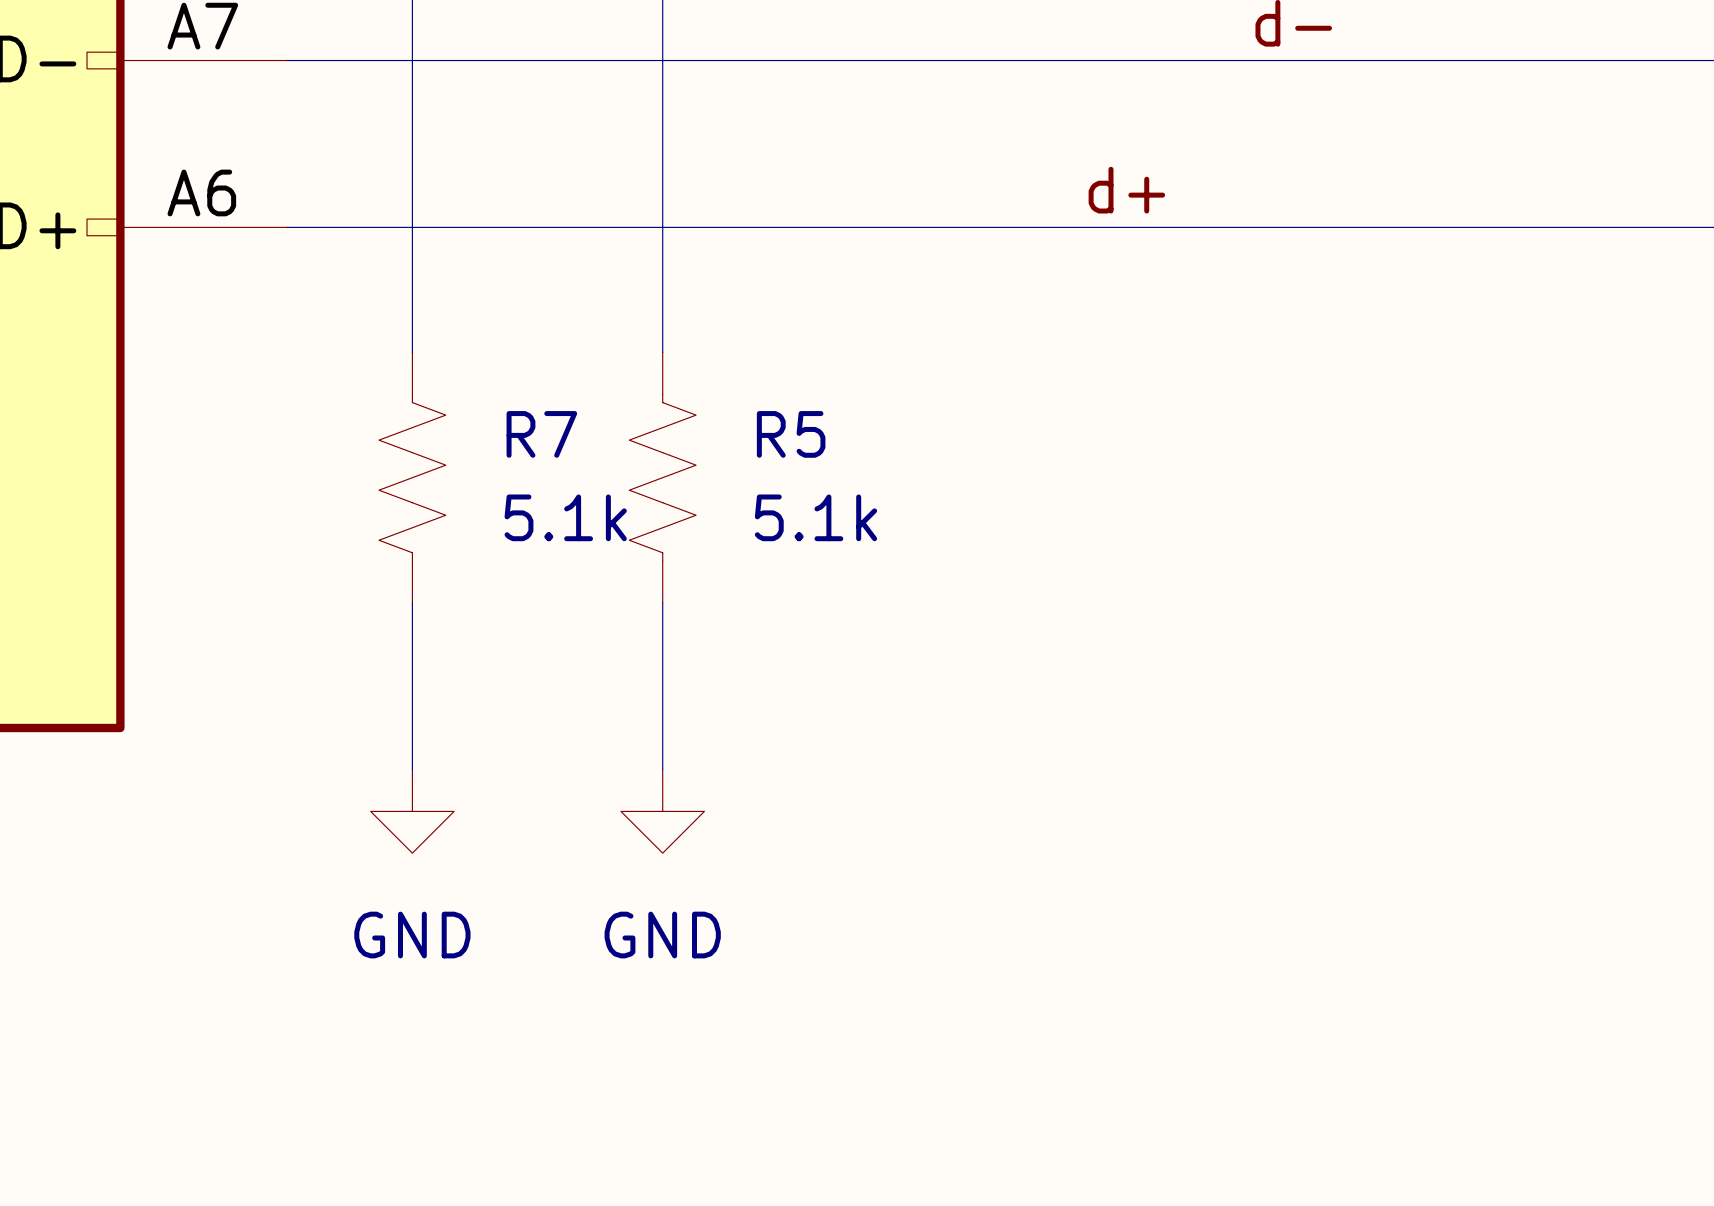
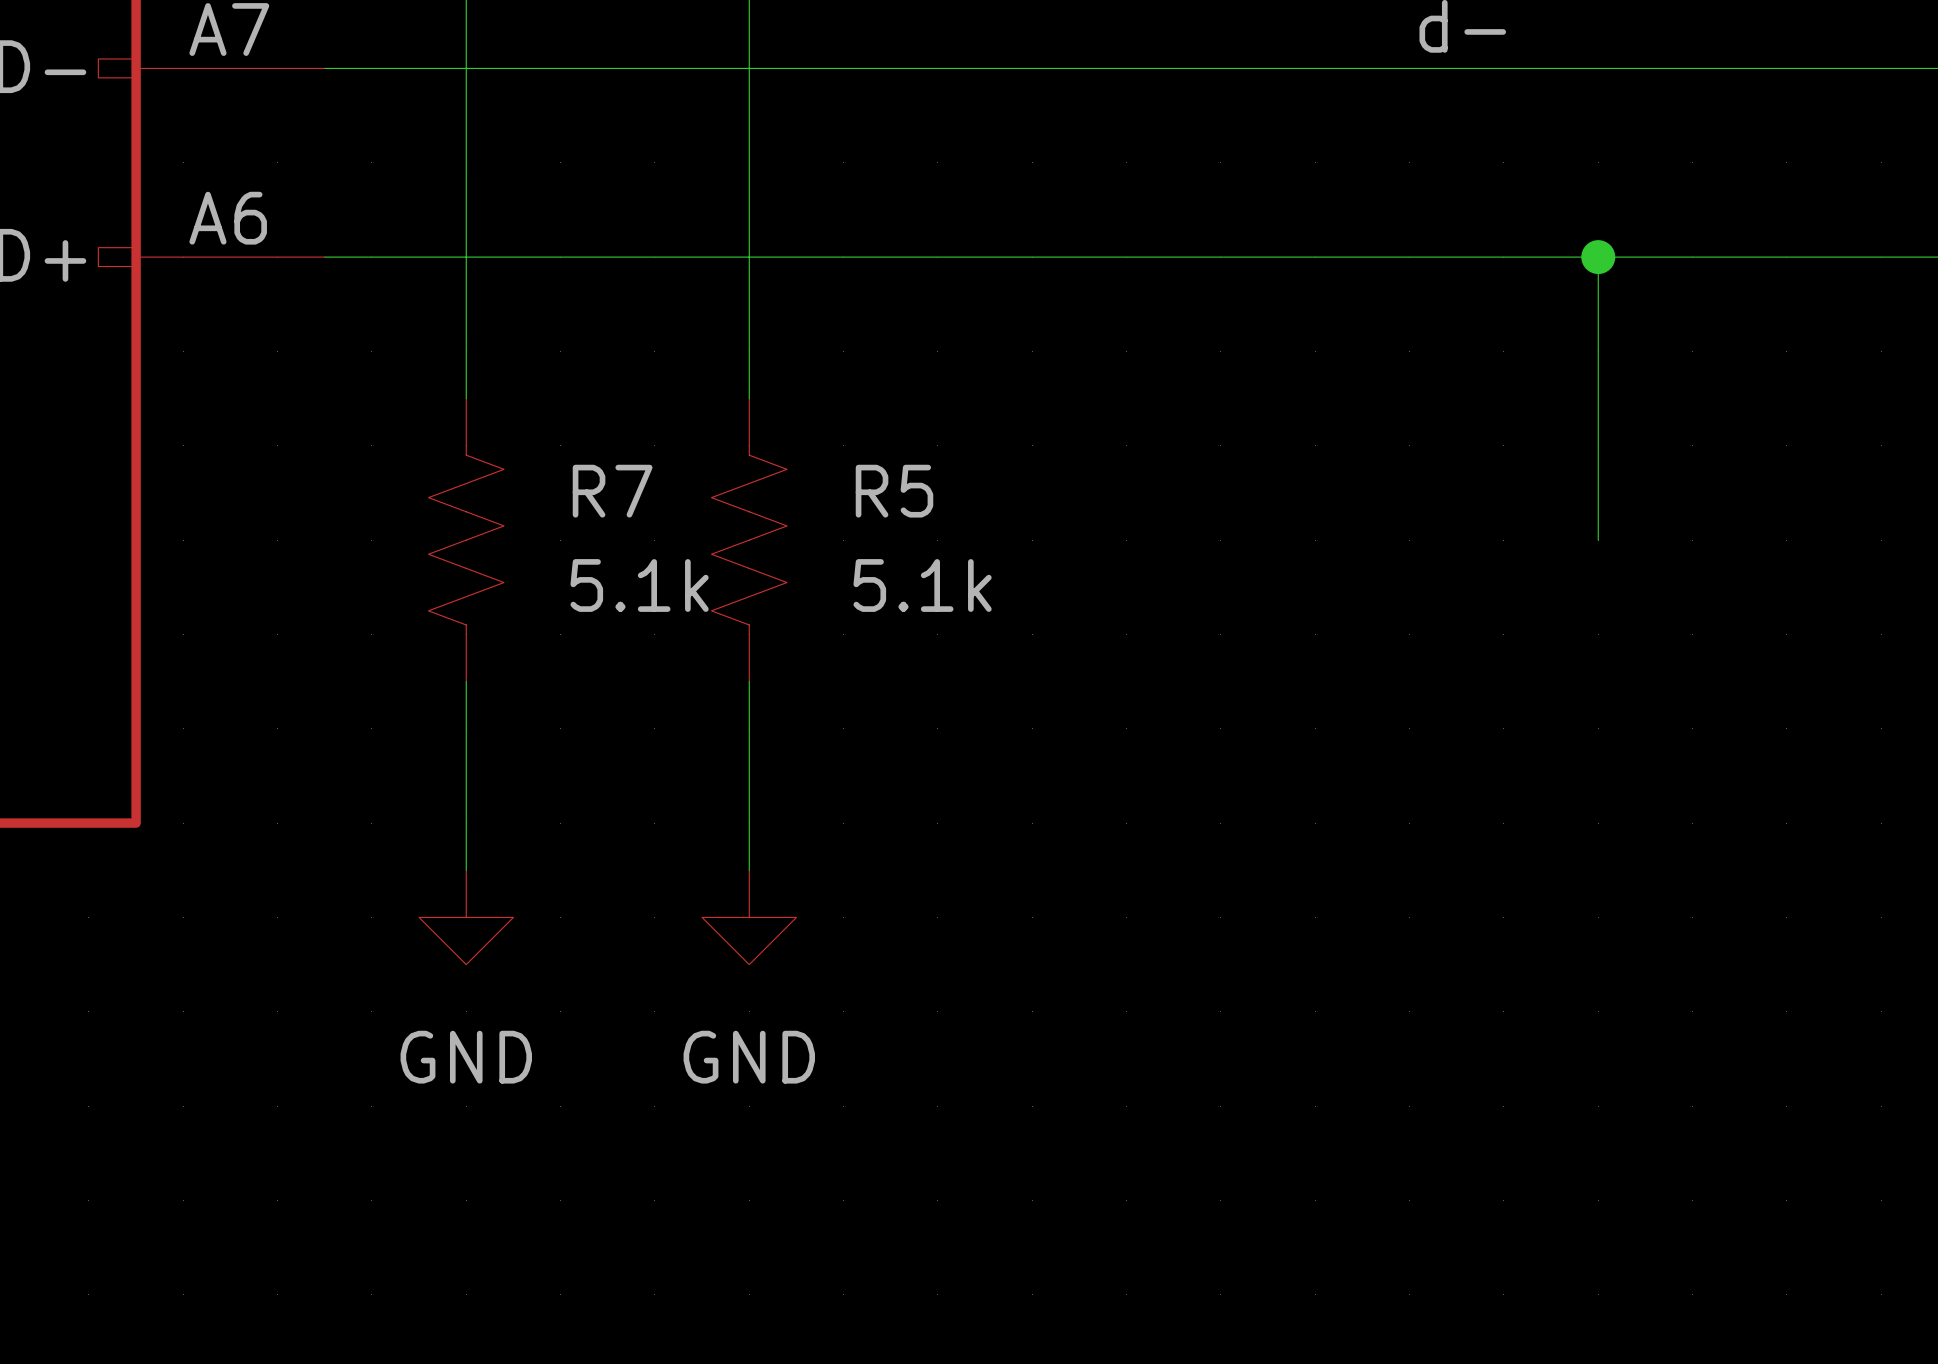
label: d+ (1126, 190) -> none
wire: none -> (1598, 257) (1598, 540)
junction: none -> (1598, 257)

